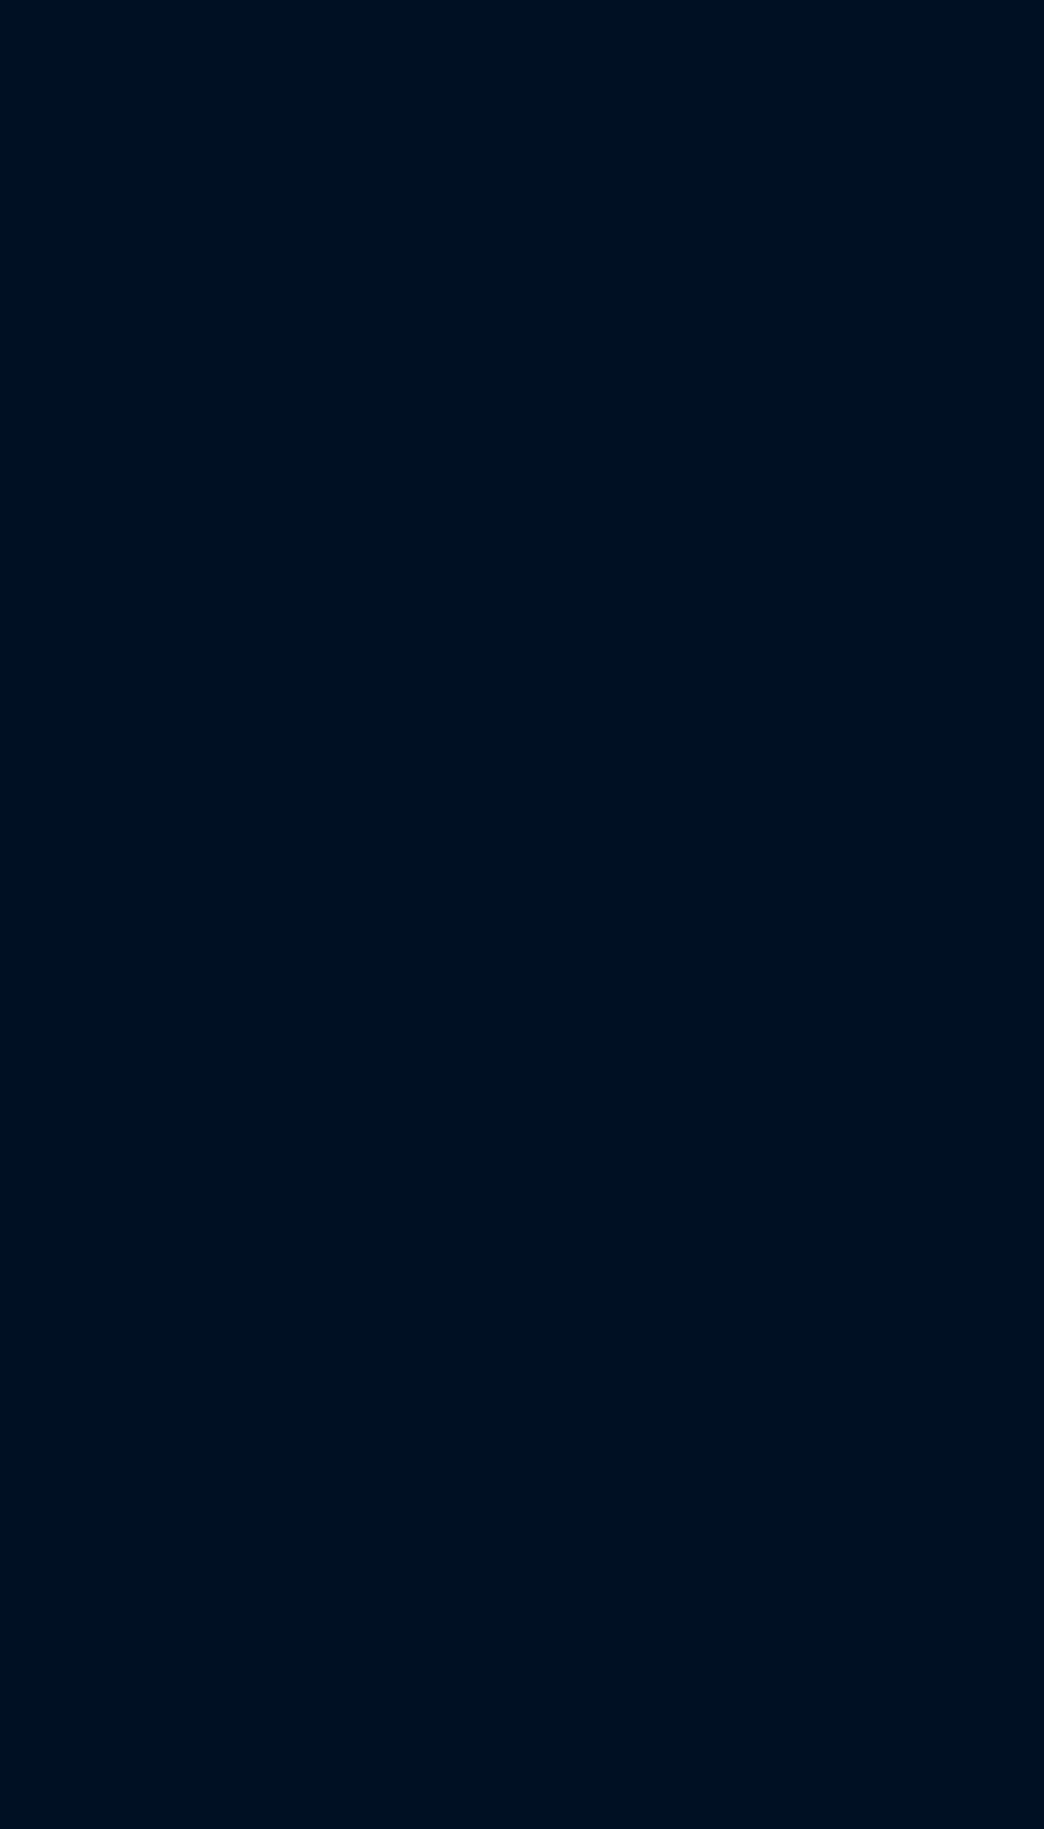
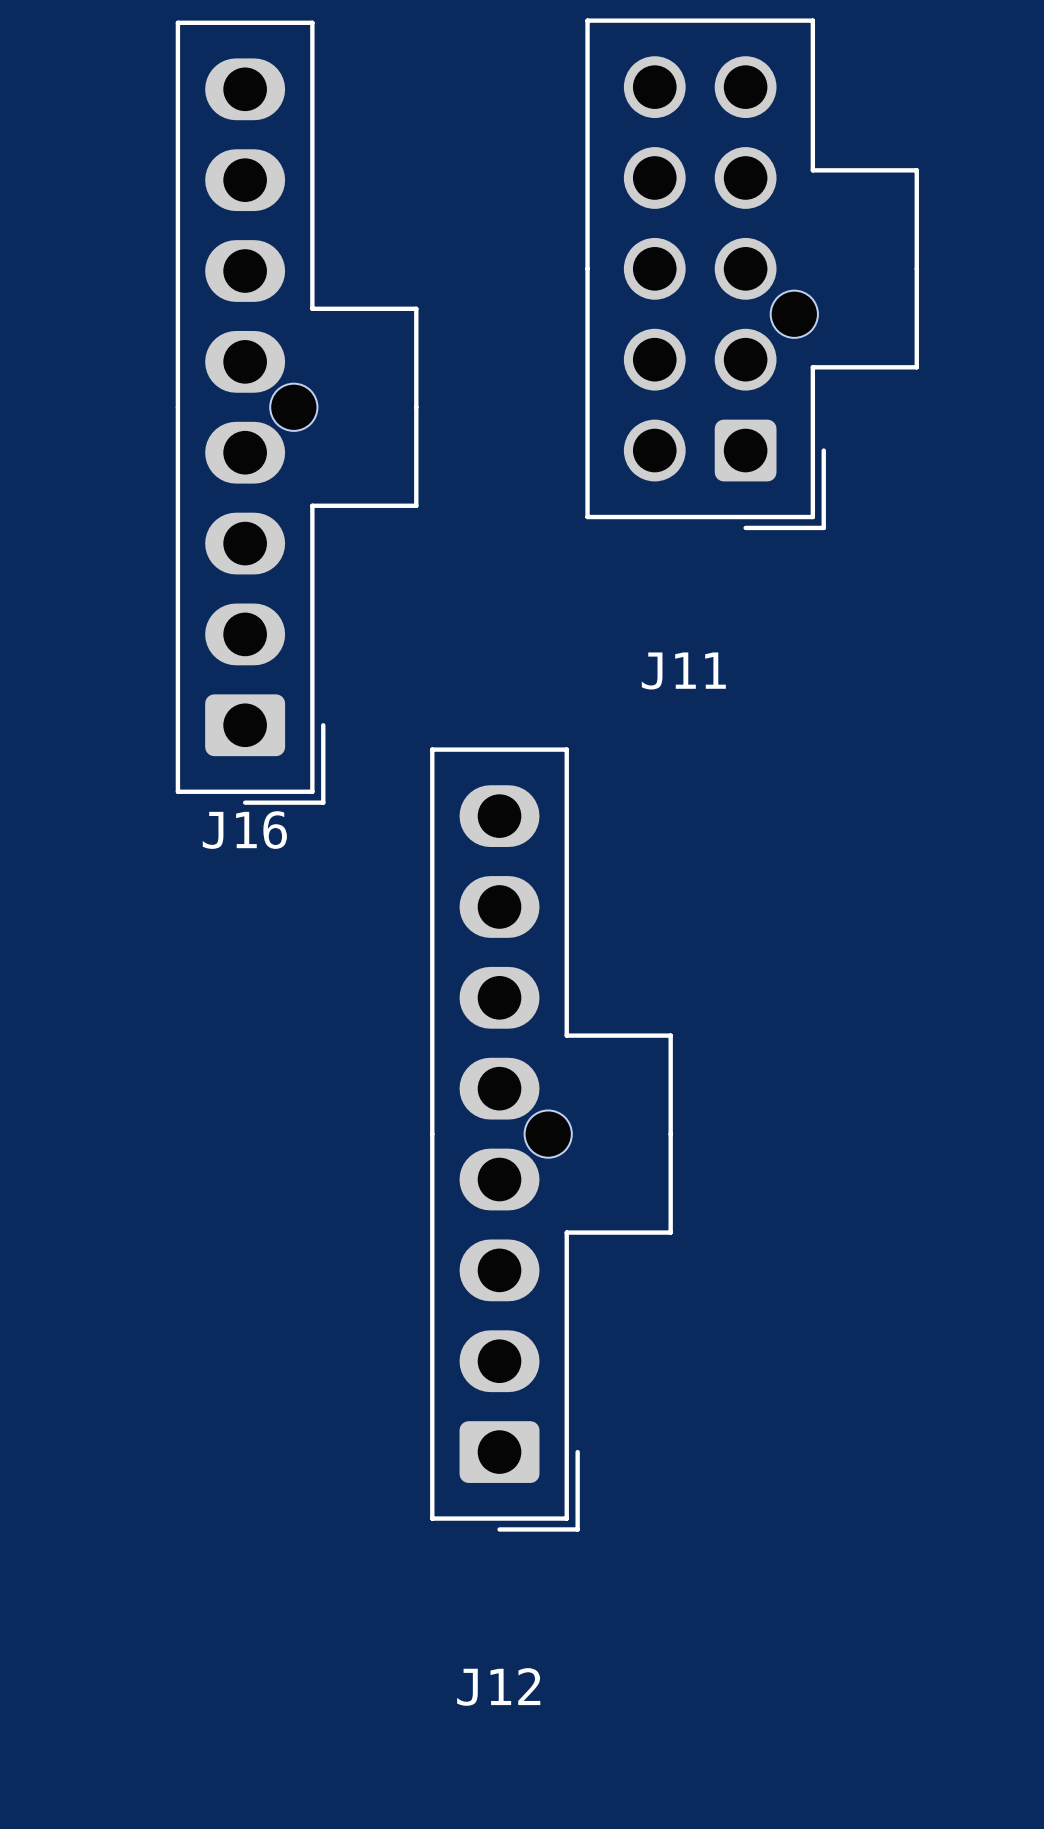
J11: none -> (752, 274)
J16: none -> (297, 412)
J12: none -> (551, 1139)

